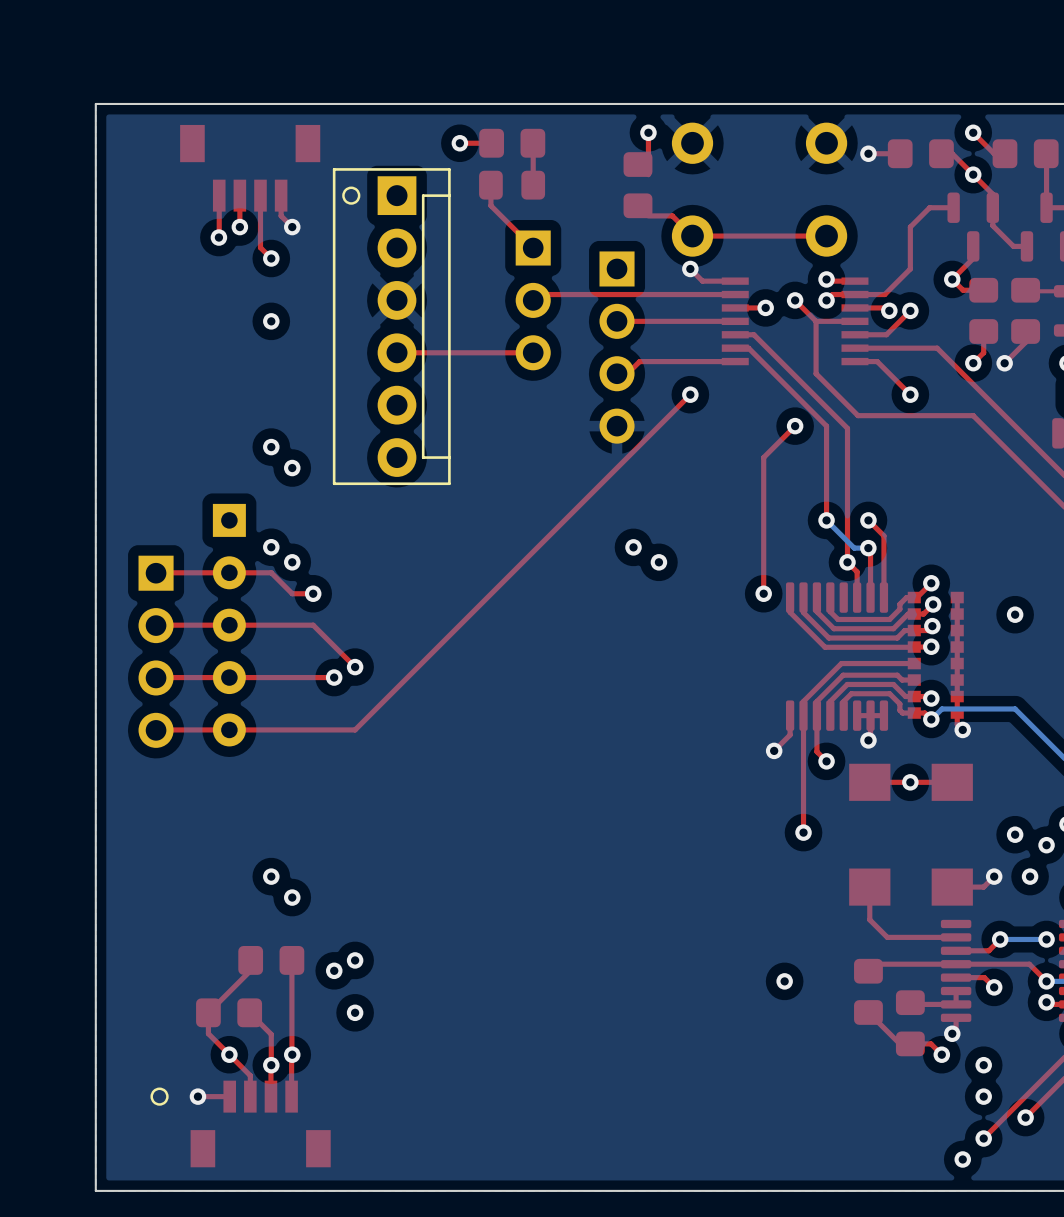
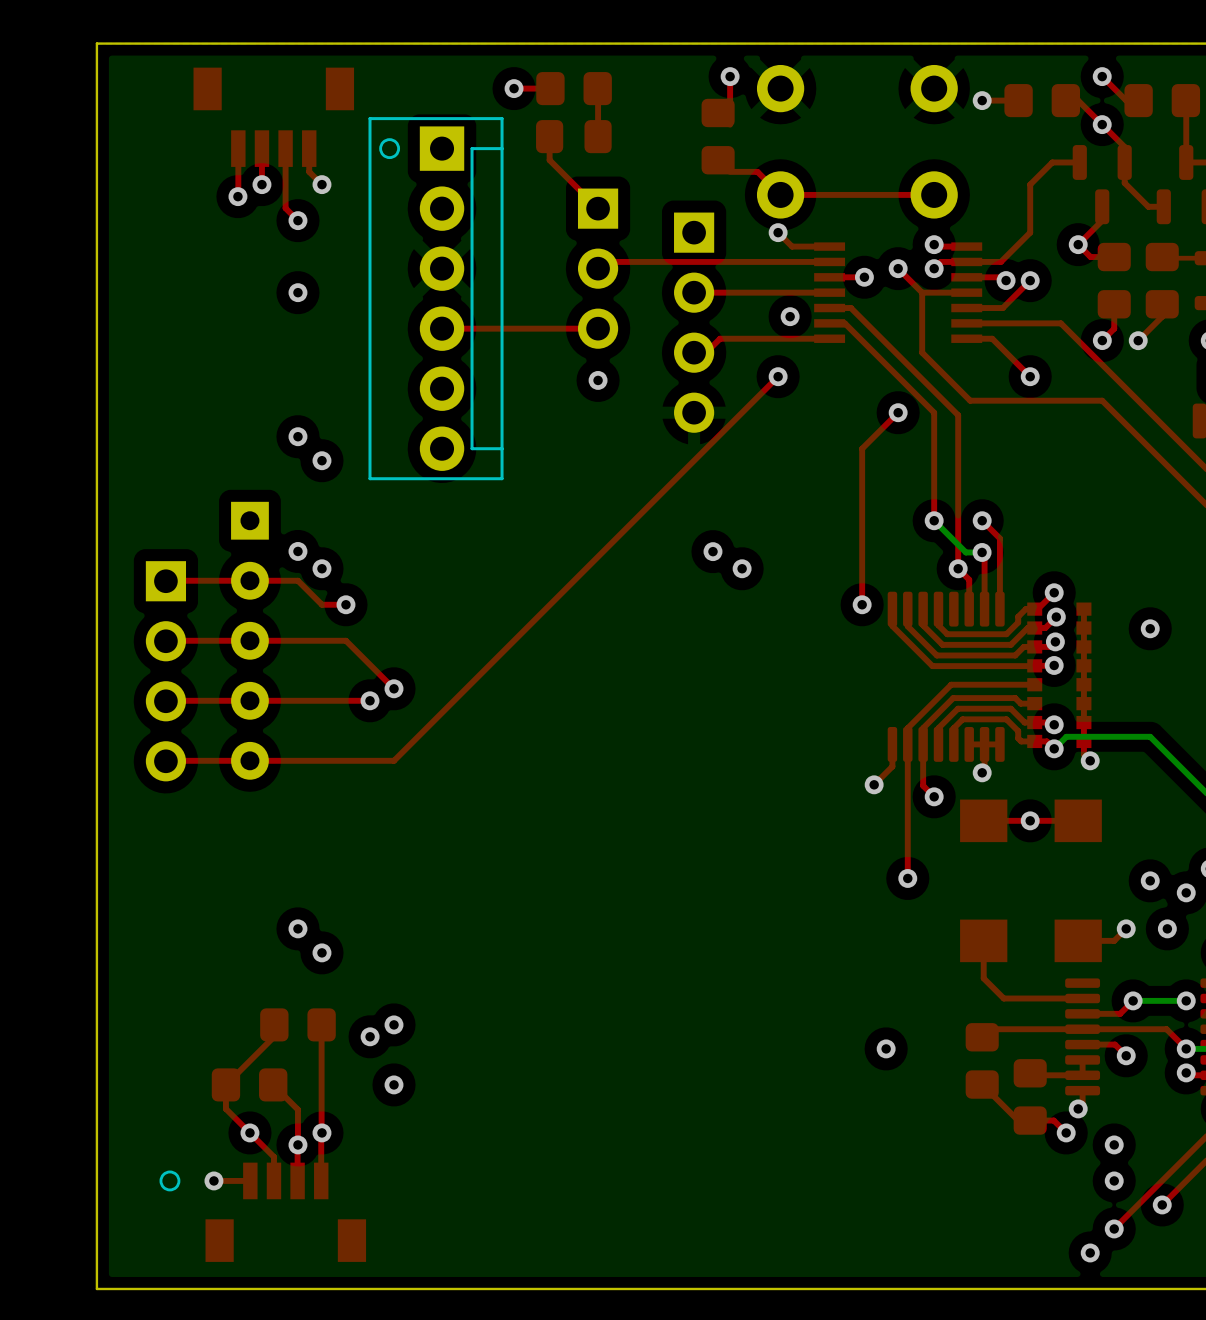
via: none -> (790, 316)
via: none -> (598, 380)

